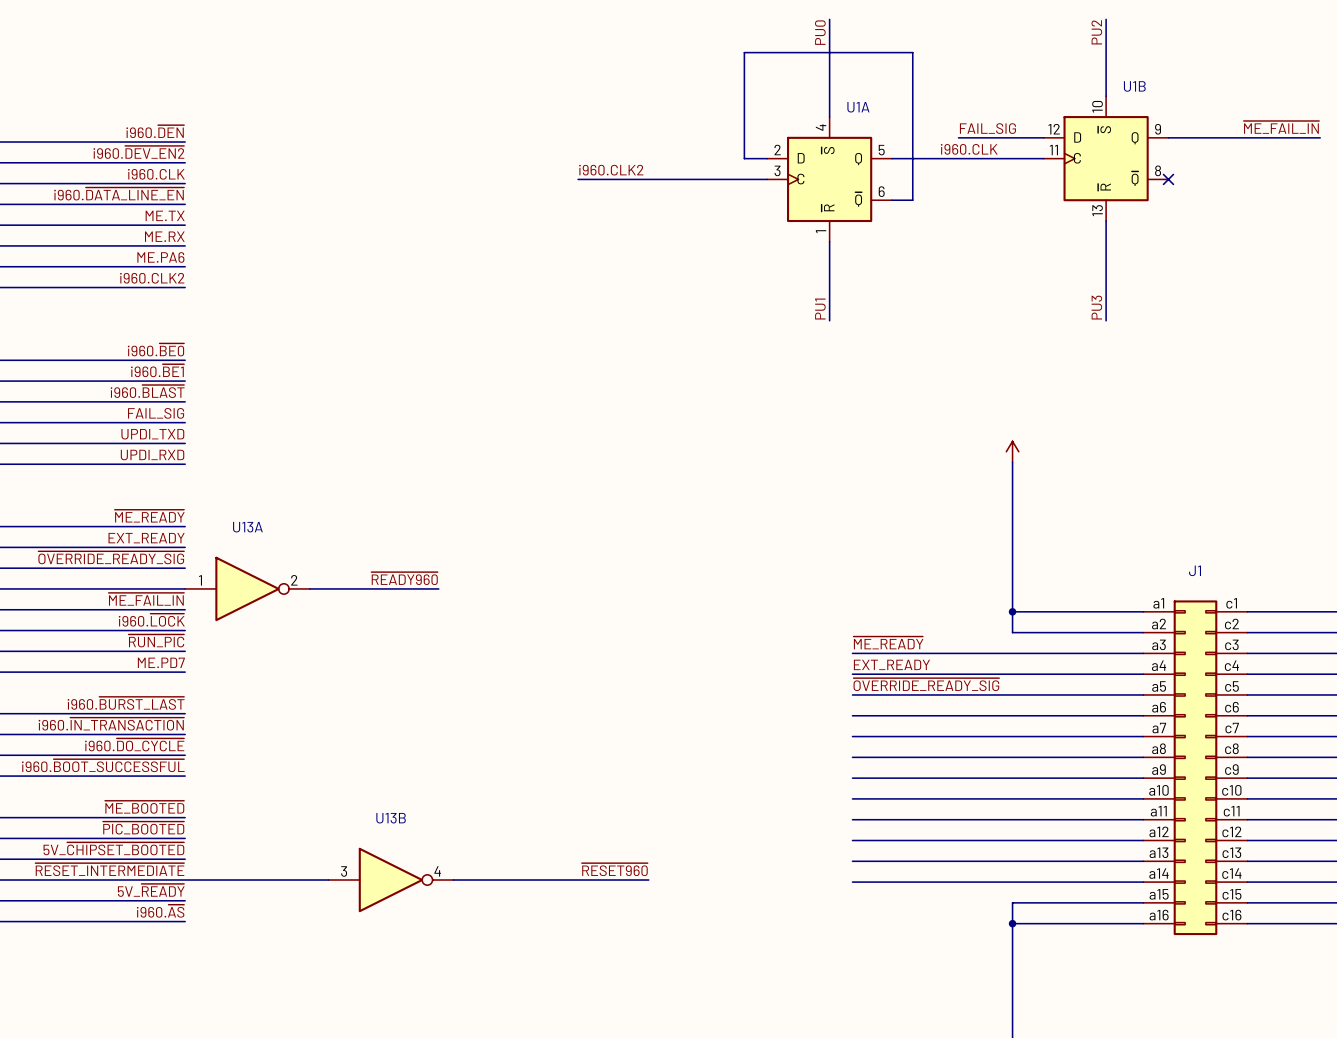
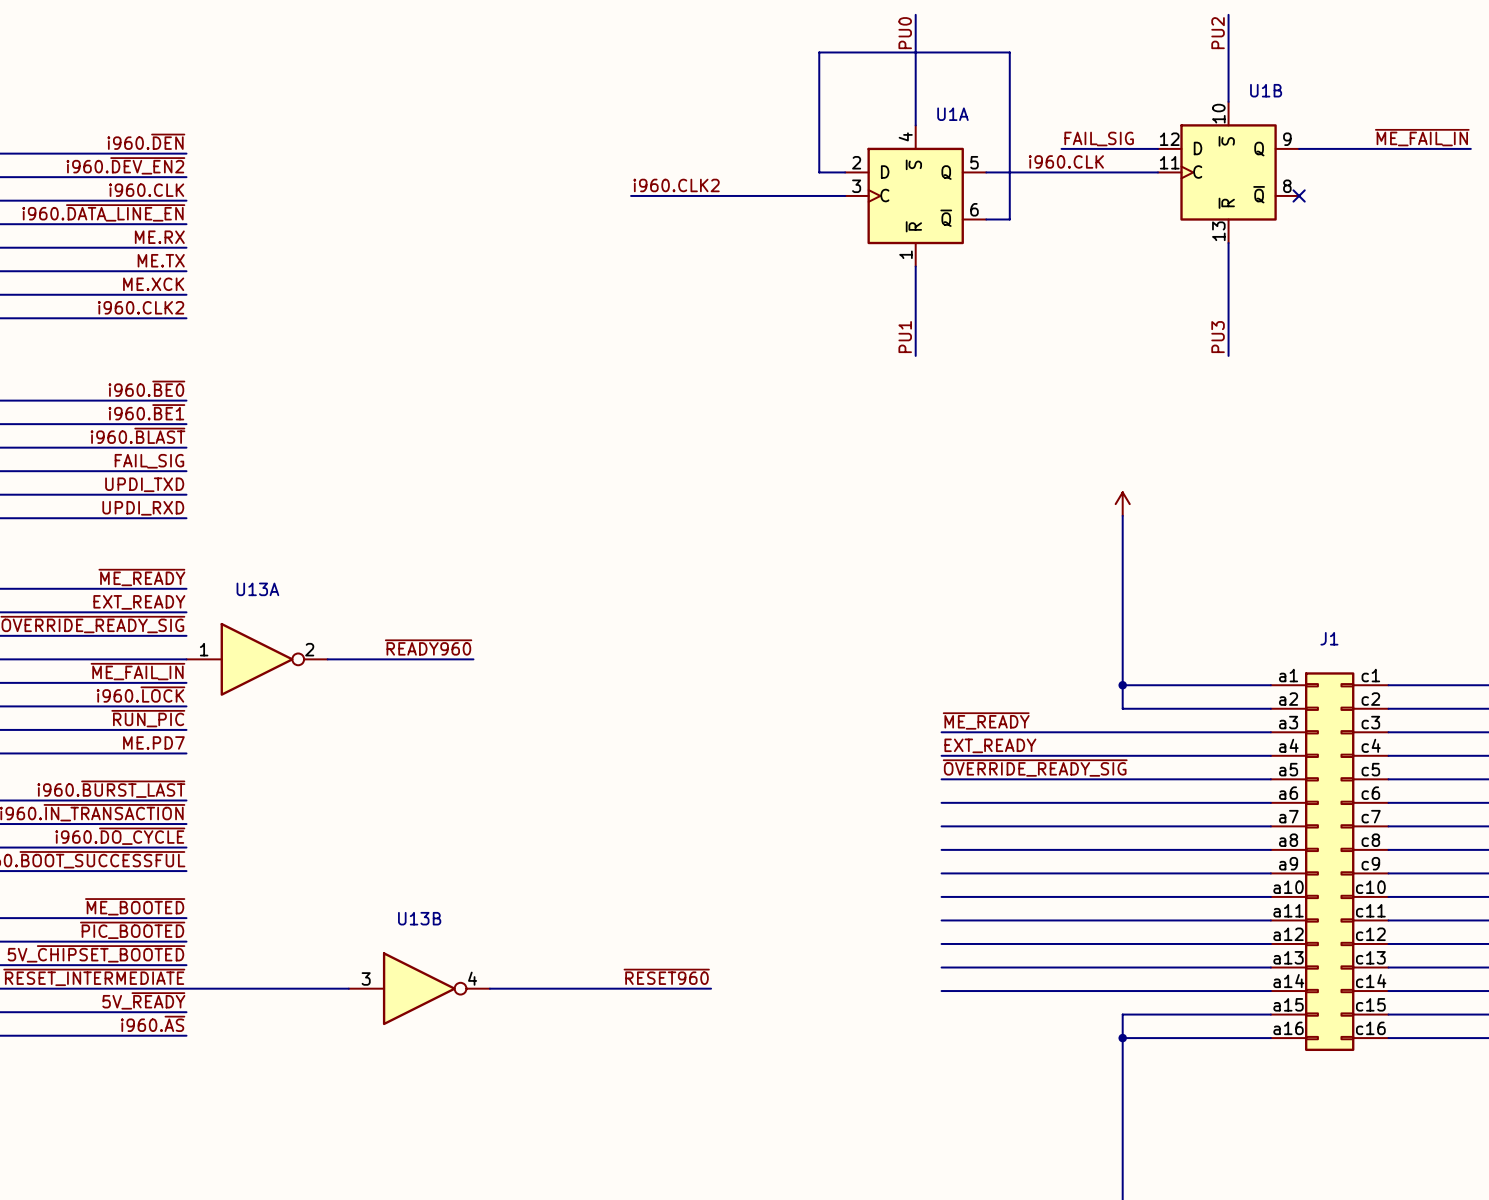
label: ME.TX (165, 215) -> ME.RX (159, 237)
label: ME.RX (164, 236) -> ME.TX (161, 260)
label: ME.PA6 (160, 257) -> ME.XCK (153, 284)

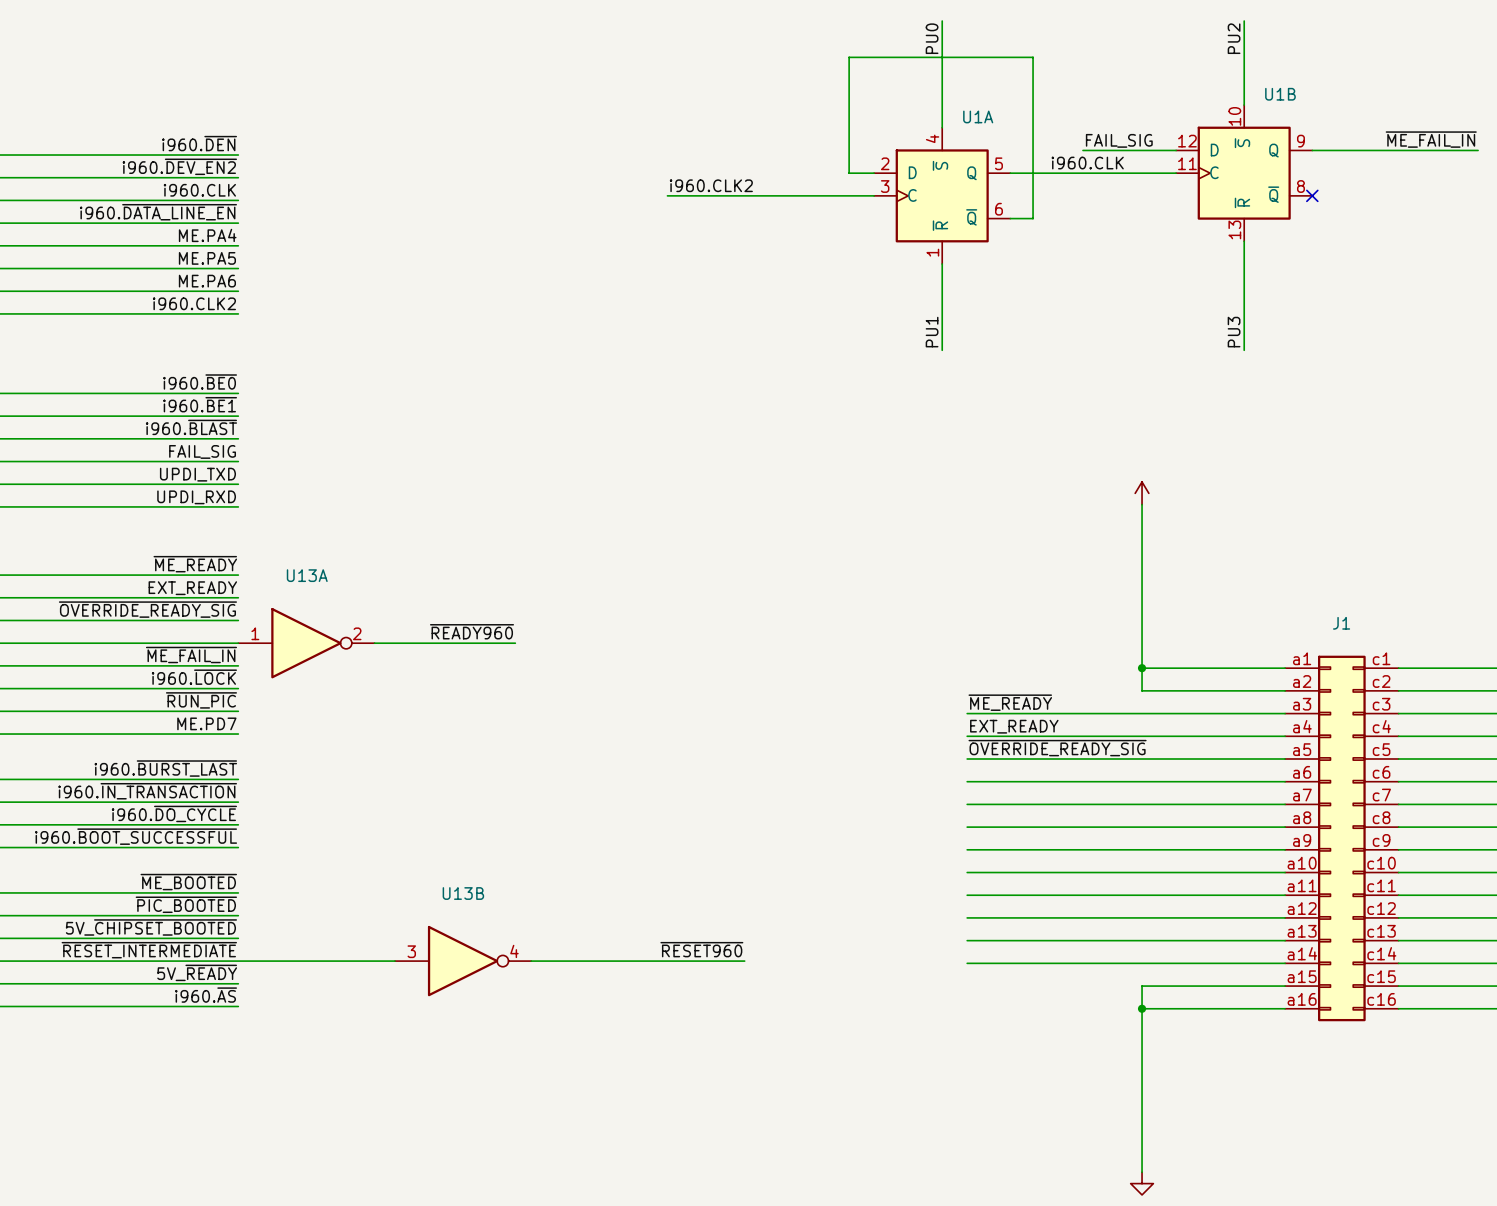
label: ME.RX (159, 237) -> ME.PA4 (207, 235)
label: ME.TX (161, 260) -> ME.PA5 (207, 258)
label: ME.XCK (153, 284) -> ME.PA6 (207, 281)

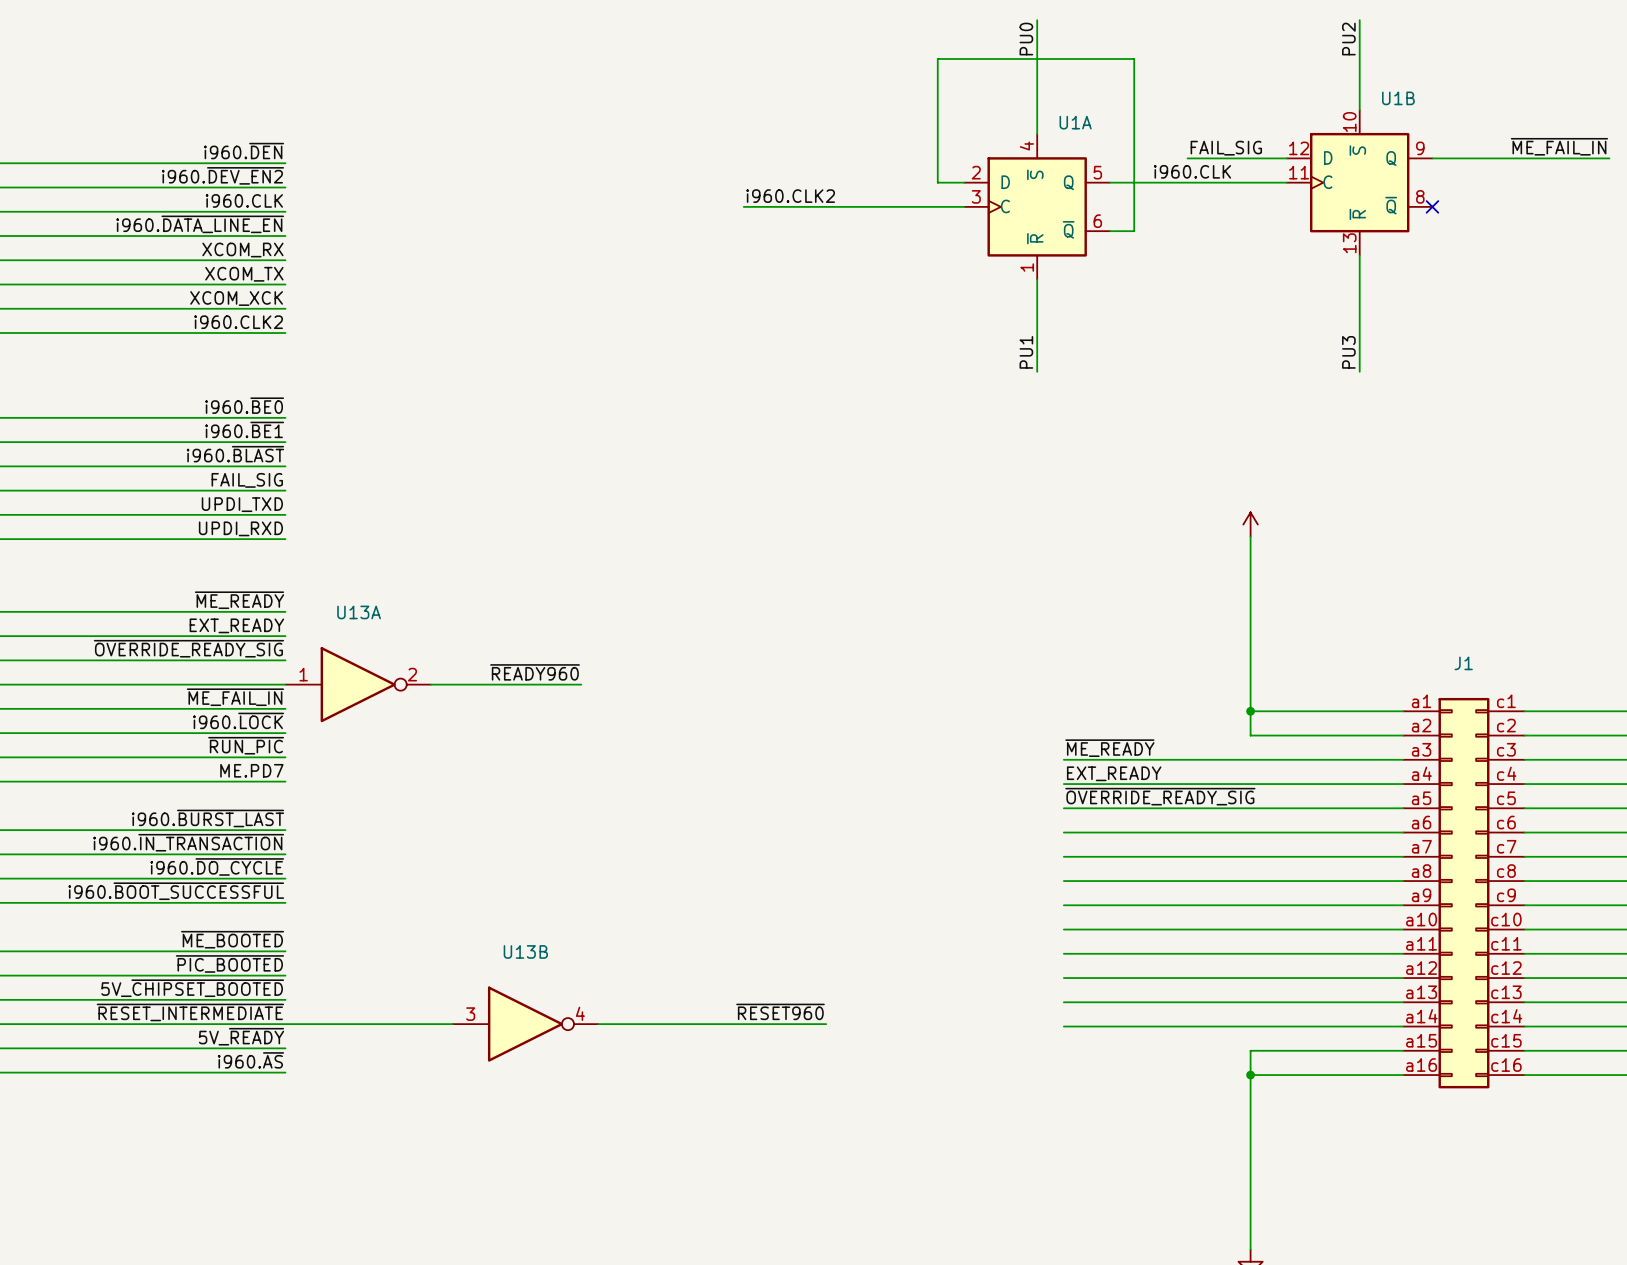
label: ME.PA4 (207, 235) -> XCOM_RX (242, 250)
label: ME.PA5 (207, 258) -> XCOM_TX (244, 274)
label: ME.PA6 (207, 281) -> XCOM_XCK (236, 298)

